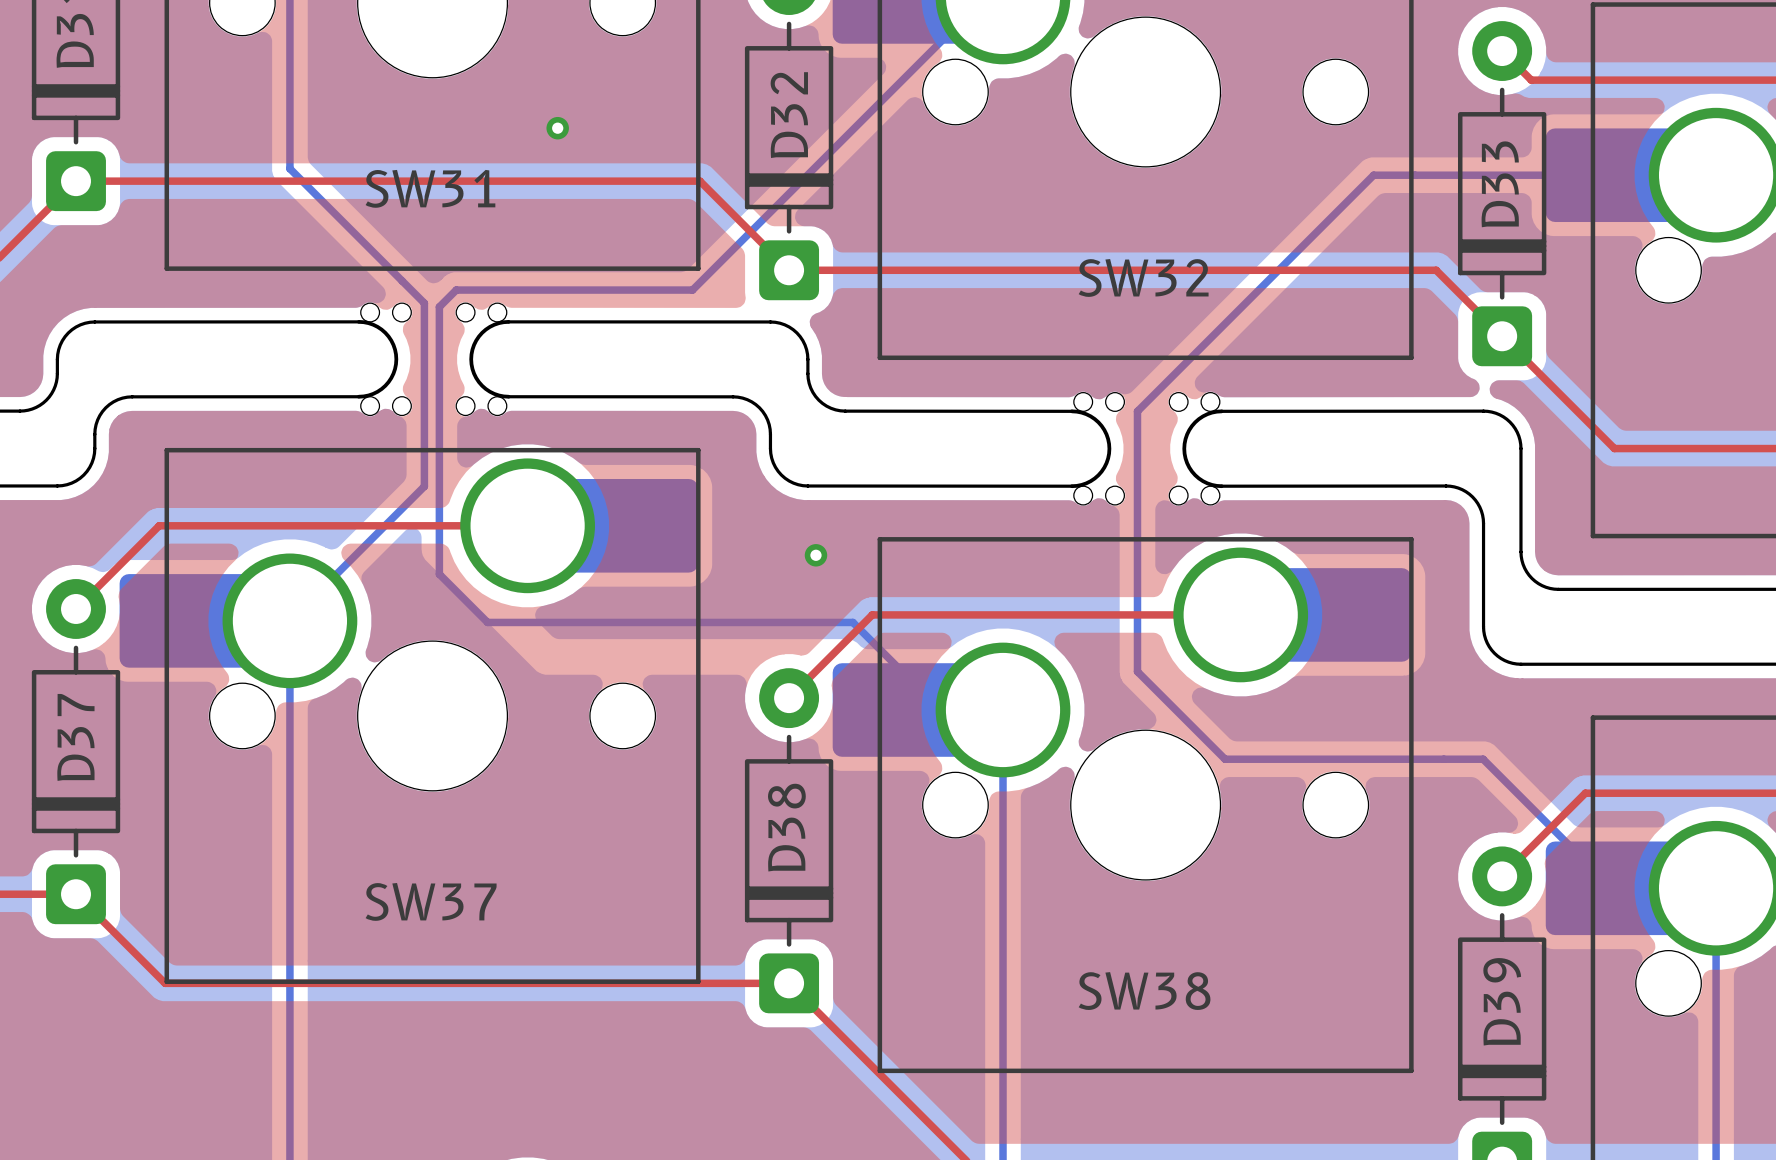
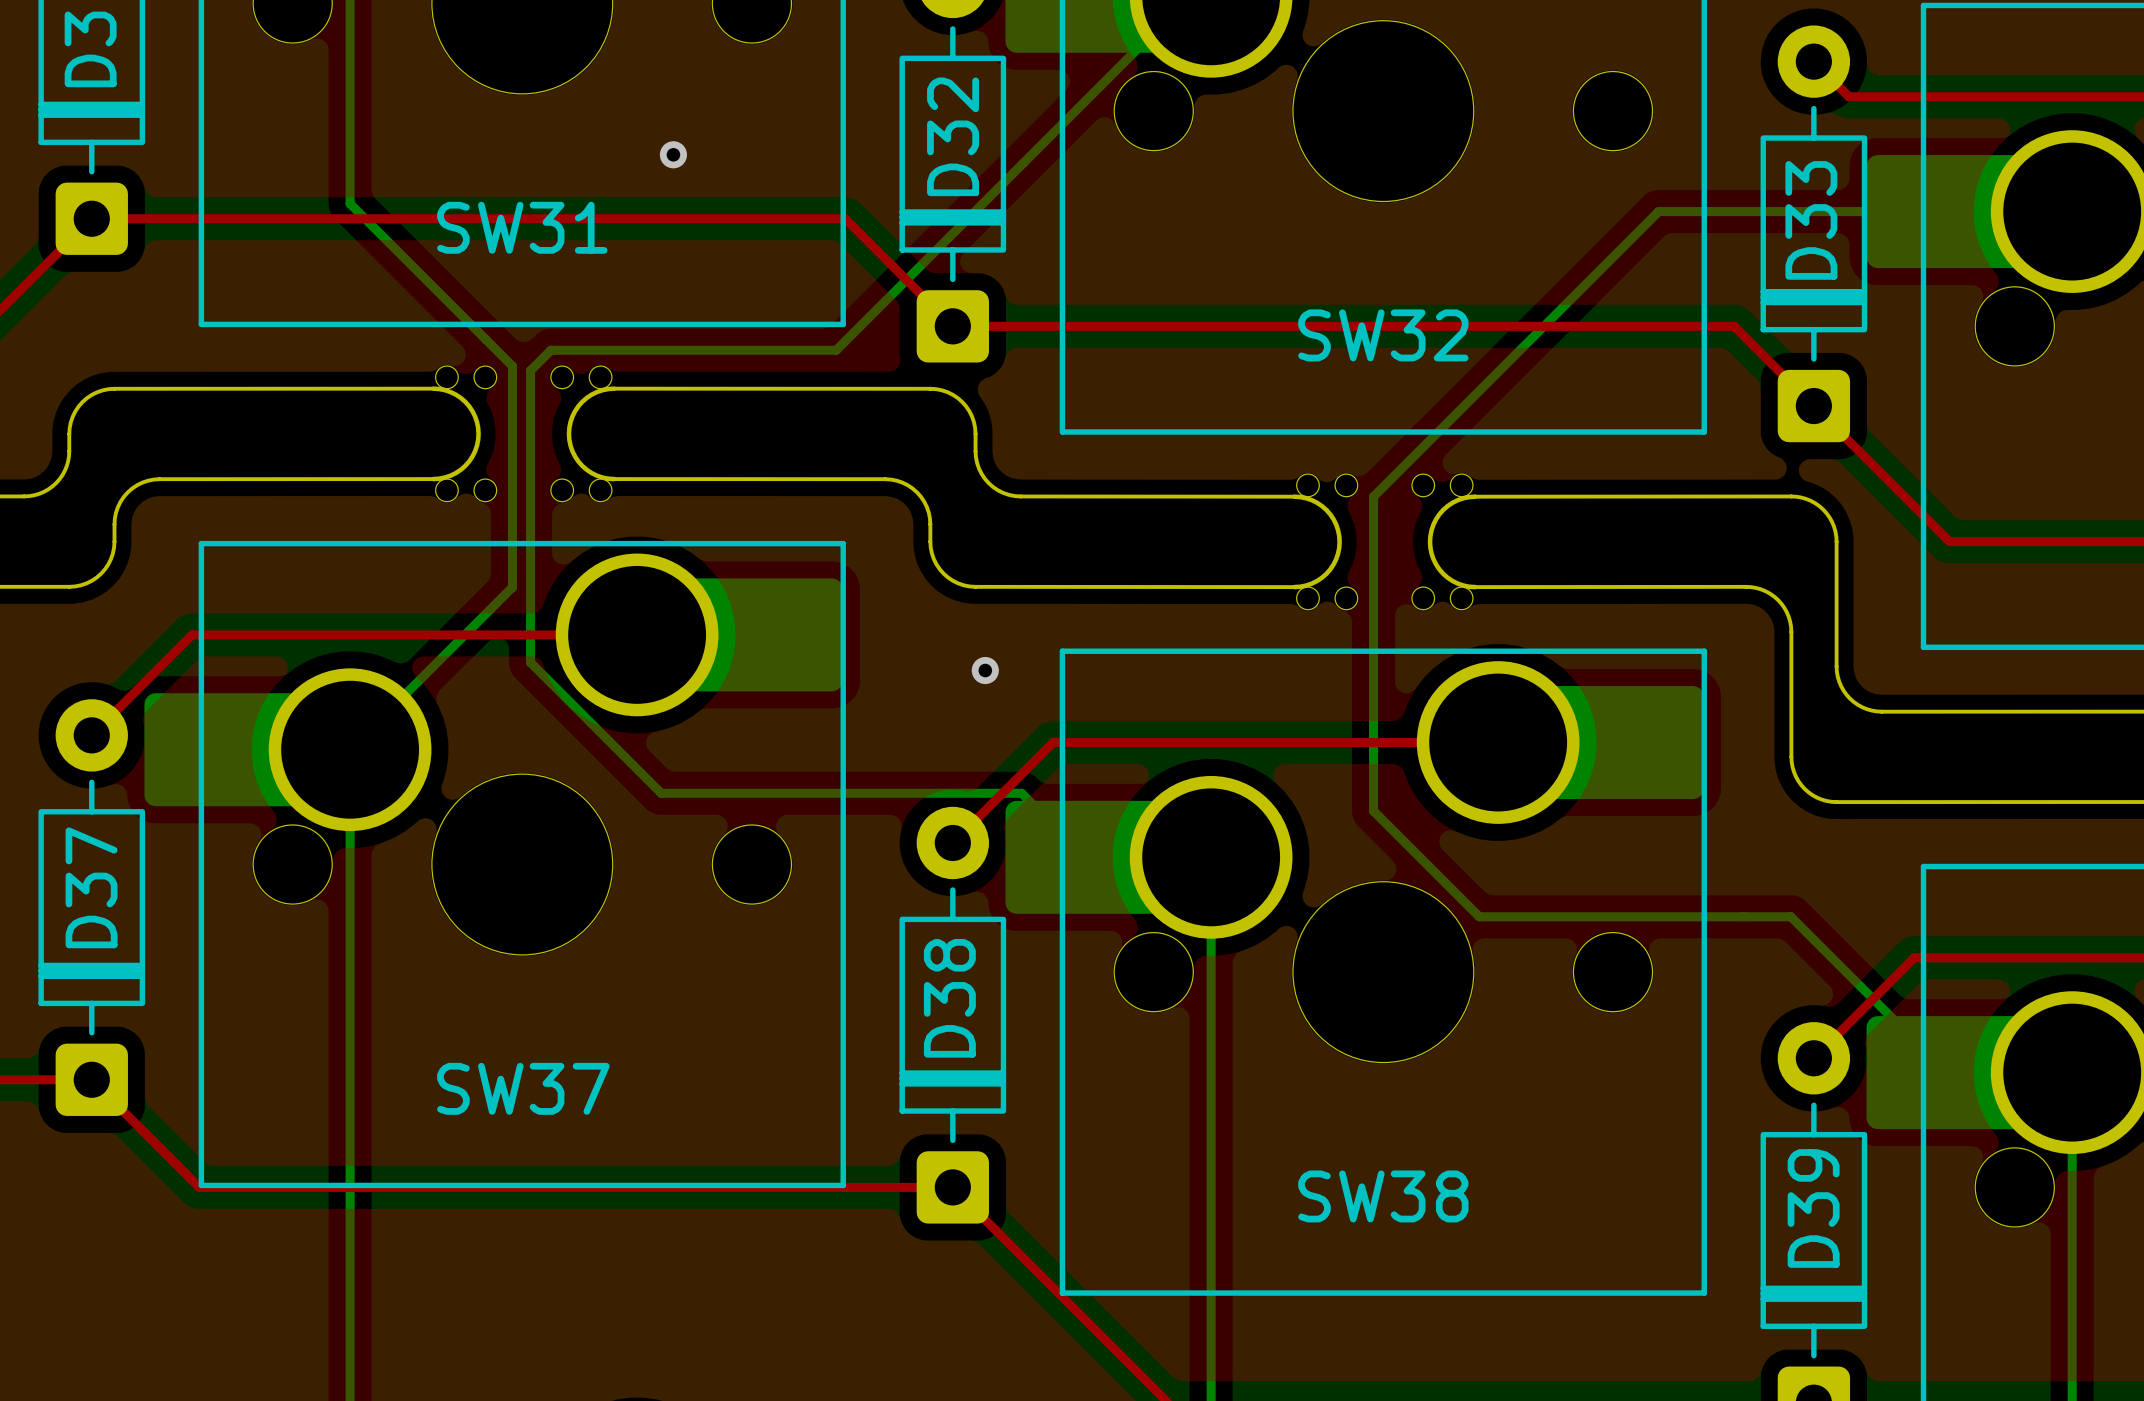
bottom track: (439, 548) (439, 574) (487, 622) (852, 622) (899, 668) (899, 710) -> (530, 662) (661, 793) (1021, 793) (1085, 857)

